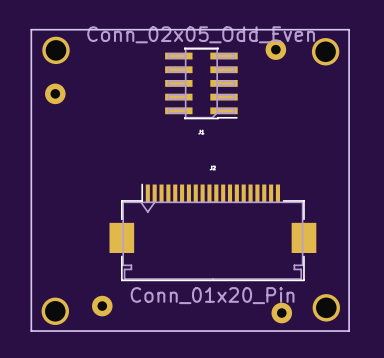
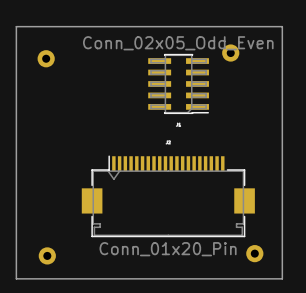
part position: (275, 49) -> (230, 53)
part: (55, 50) -> none
part: (325, 51) -> none
part position: (201, 83) -> (178, 83)
part position: (55, 93) -> (46, 58)
part footprint: [312, 294, 341, 322] -> [246, 245, 264, 263]
part position: (102, 306) -> (47, 255)
part: (55, 311) -> none
part: (281, 313) -> none

